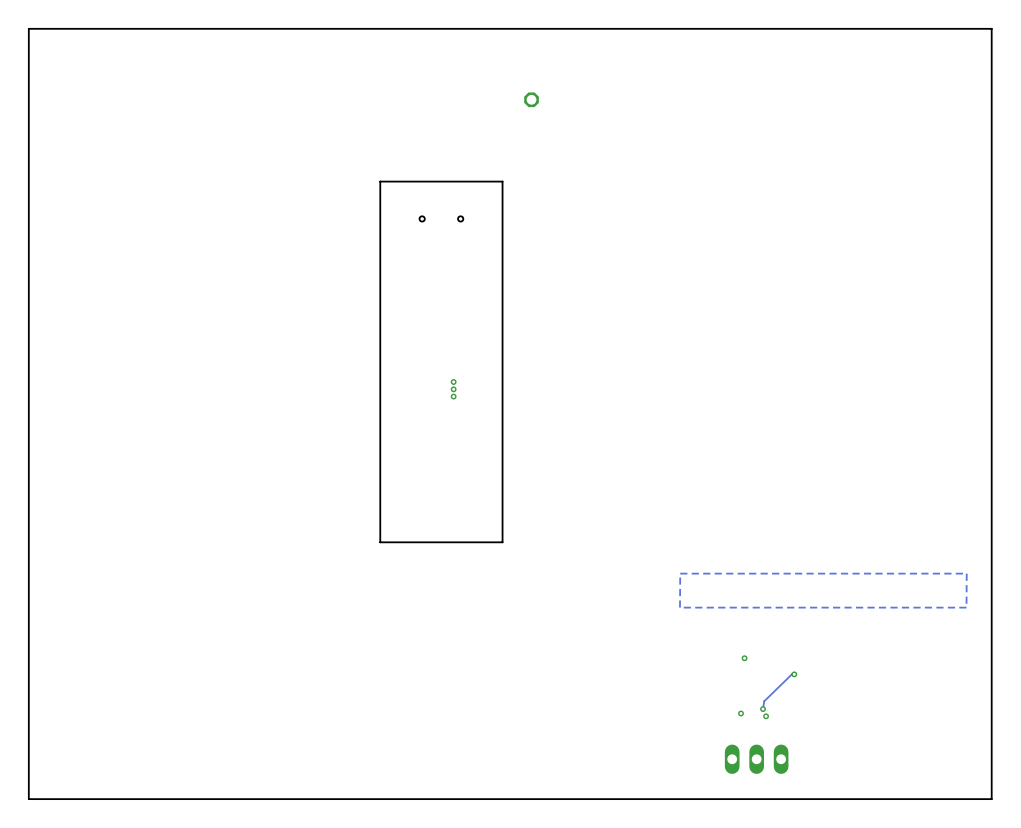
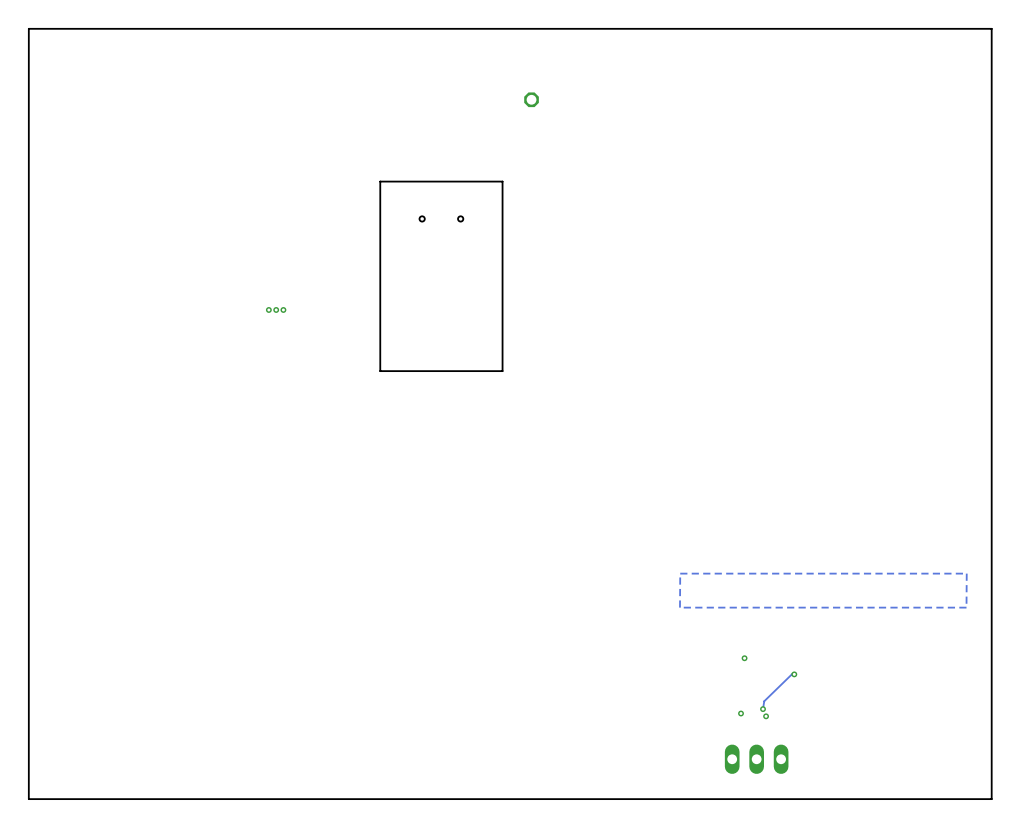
via: none -> (268, 309)
via: none -> (276, 309)
via: none -> (283, 309)
board edge: (502, 371) (502, 542) (380, 542) (380, 371) -> (502, 371) (380, 371)
via: (453, 382) -> none
via: (453, 389) -> none
via: (453, 396) -> none

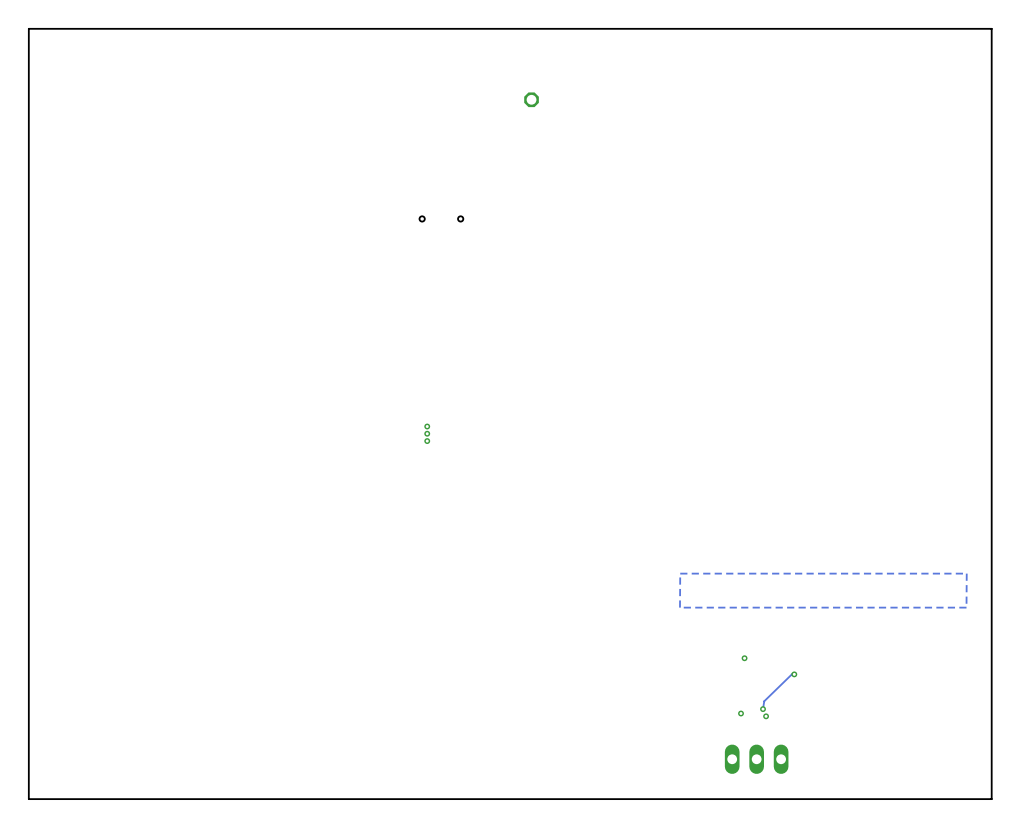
board edge: (502, 181) (380, 181) (380, 371) (502, 371) (502, 181) -> none
via: (268, 309) -> none
via: (276, 309) -> none
via: (283, 309) -> none
via: none -> (427, 426)
via: none -> (427, 433)
via: none -> (427, 441)

